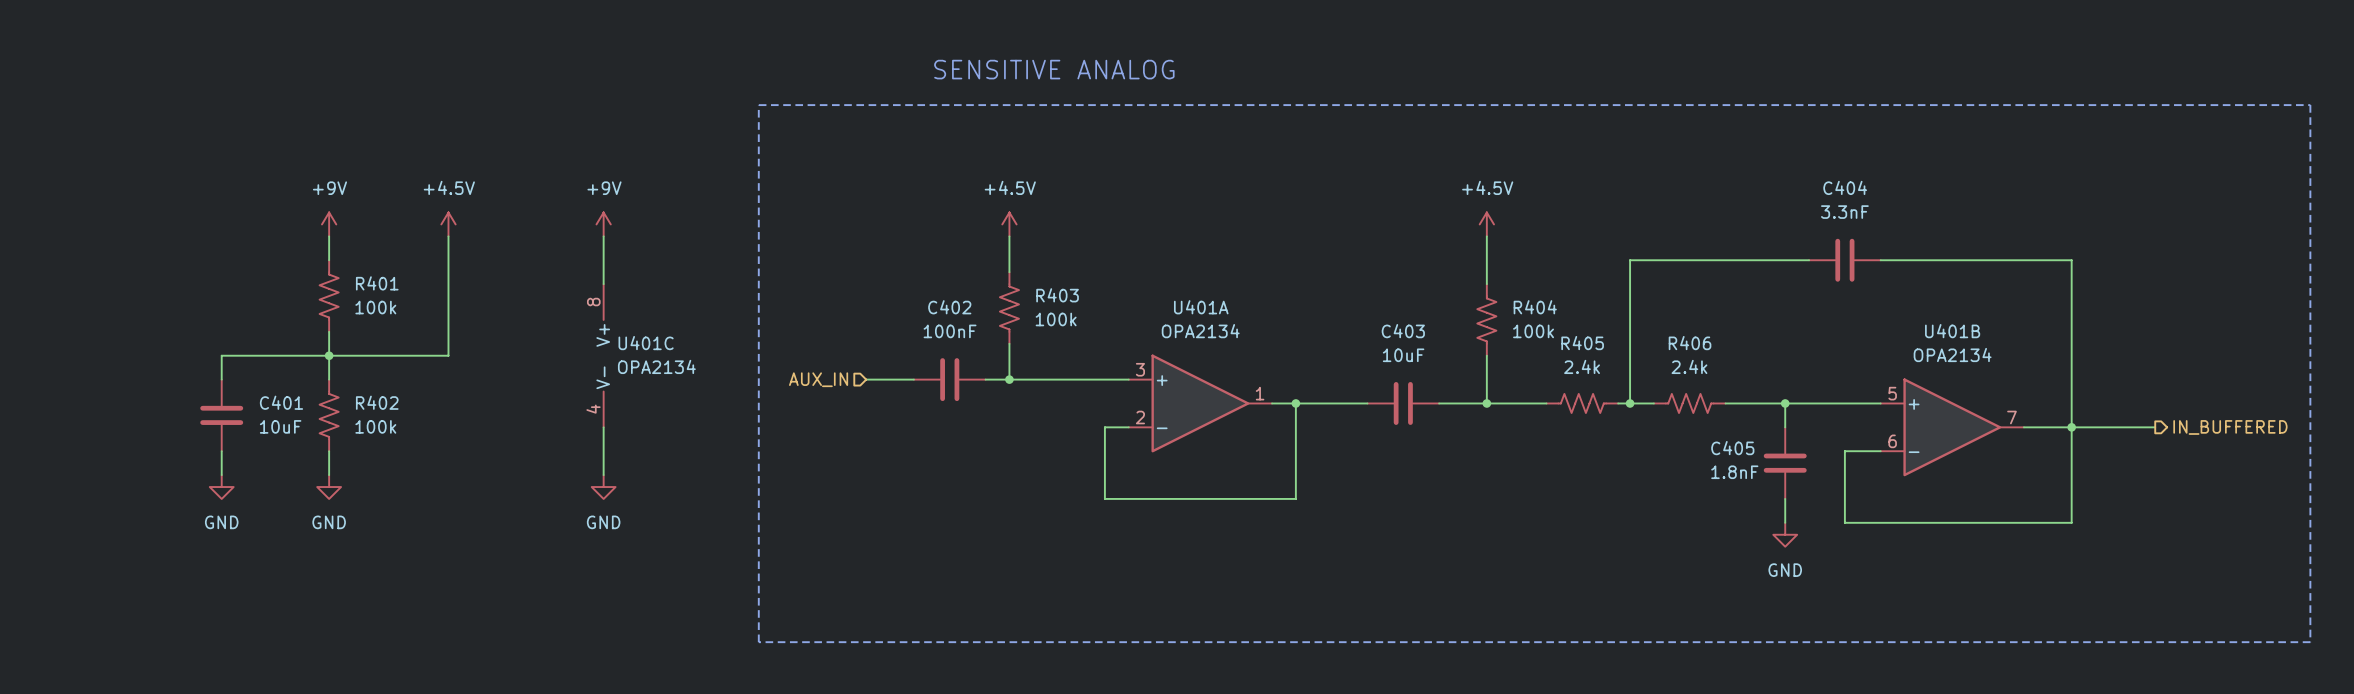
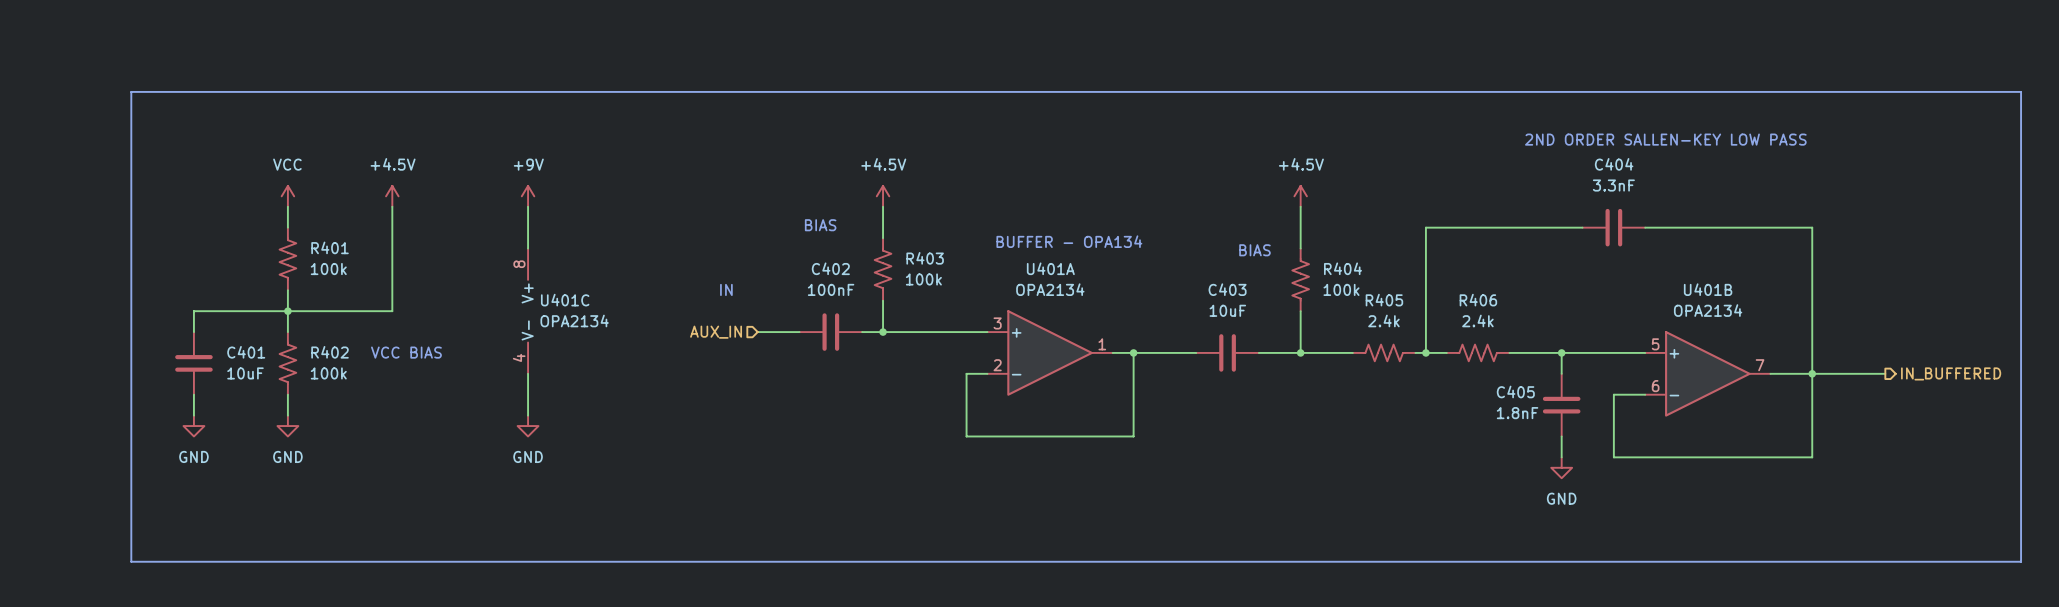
text: SENSITIVE ANALOG (1054, 69) -> none
line: (758, 105) (2310, 105) (2310, 642) (758, 642) (758, 105) -> (131, 91) (131, 561) (2021, 561) (2021, 91) (131, 91)
text: none -> 2ND ORDER SALLEN-KEY LOW PASS (1665, 139)
power symbol: +9V (329, 224) -> VCC (287, 196)
text: none -> BIAS (820, 225)
text: none -> BUFFER - OPA134 (1069, 241)
text: none -> BIAS (1254, 250)
text: none -> IN (726, 289)
text: none -> VCC BIAS (406, 352)

